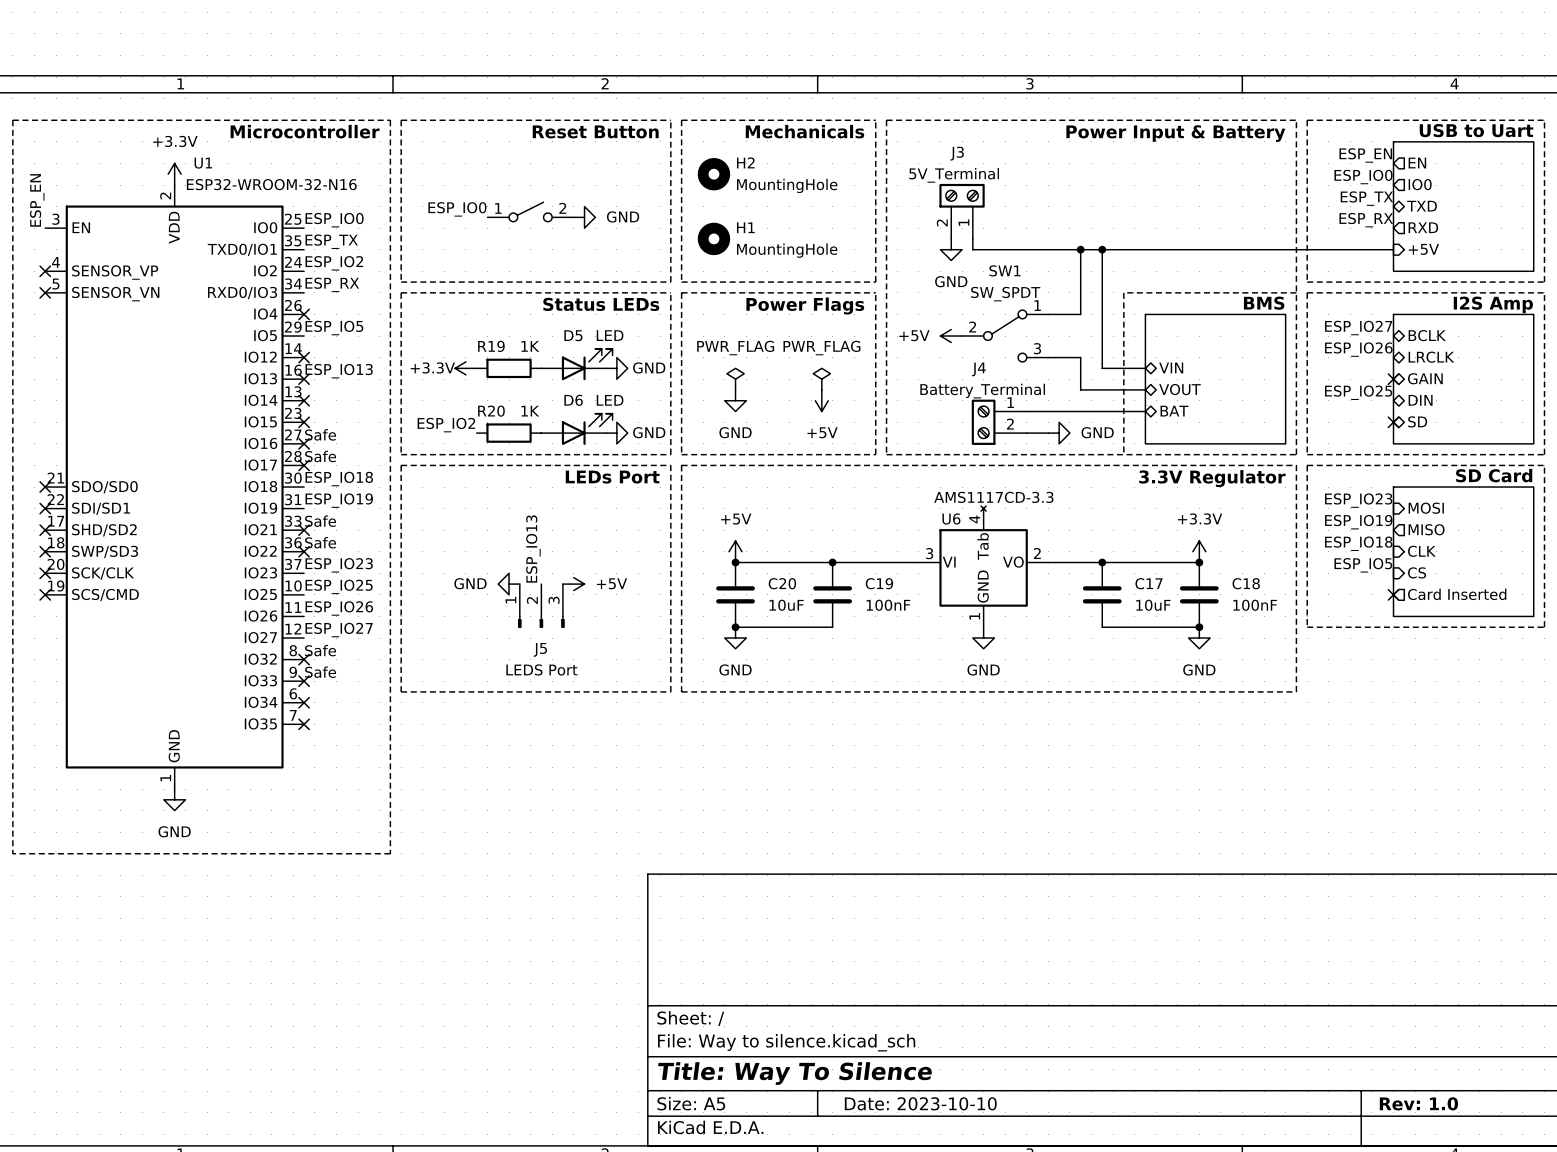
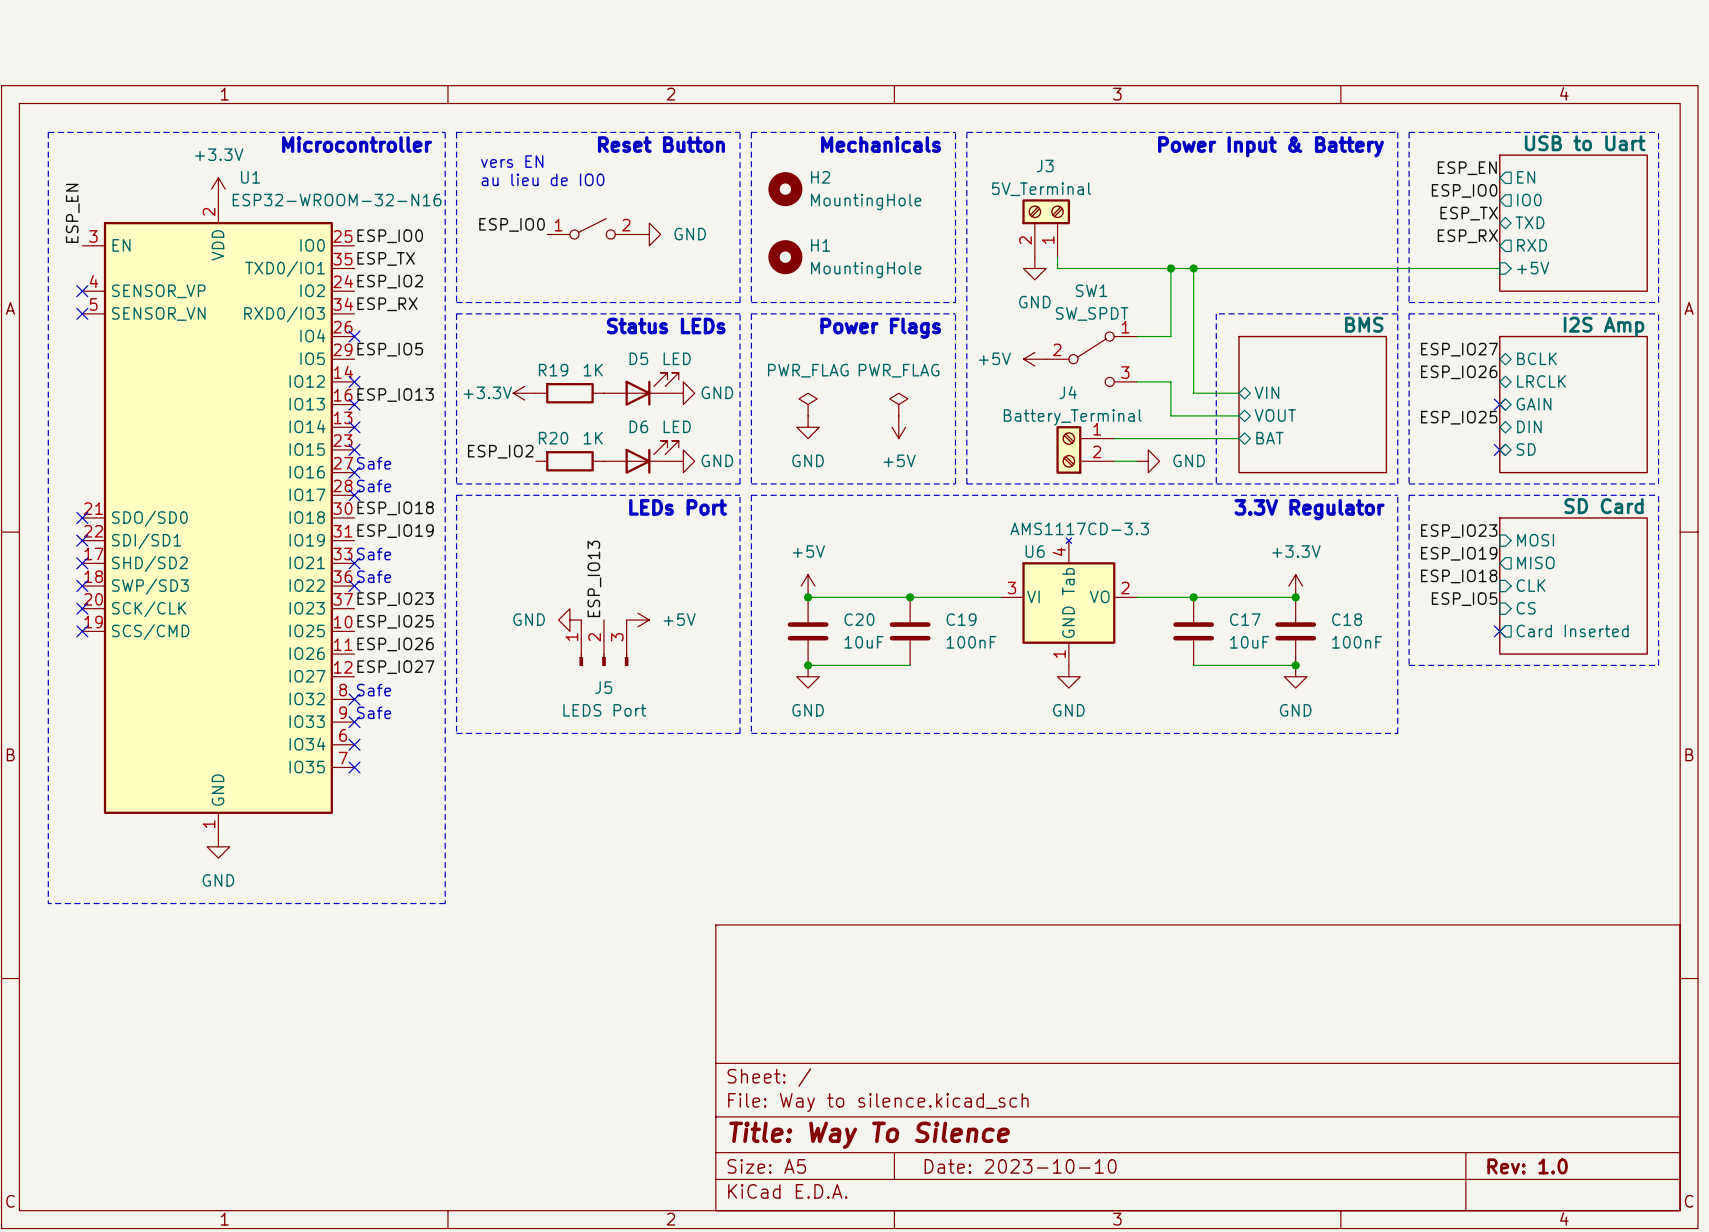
text: none -> vers EN (512, 161)
text: none -> au lieu de IO0 (543, 179)

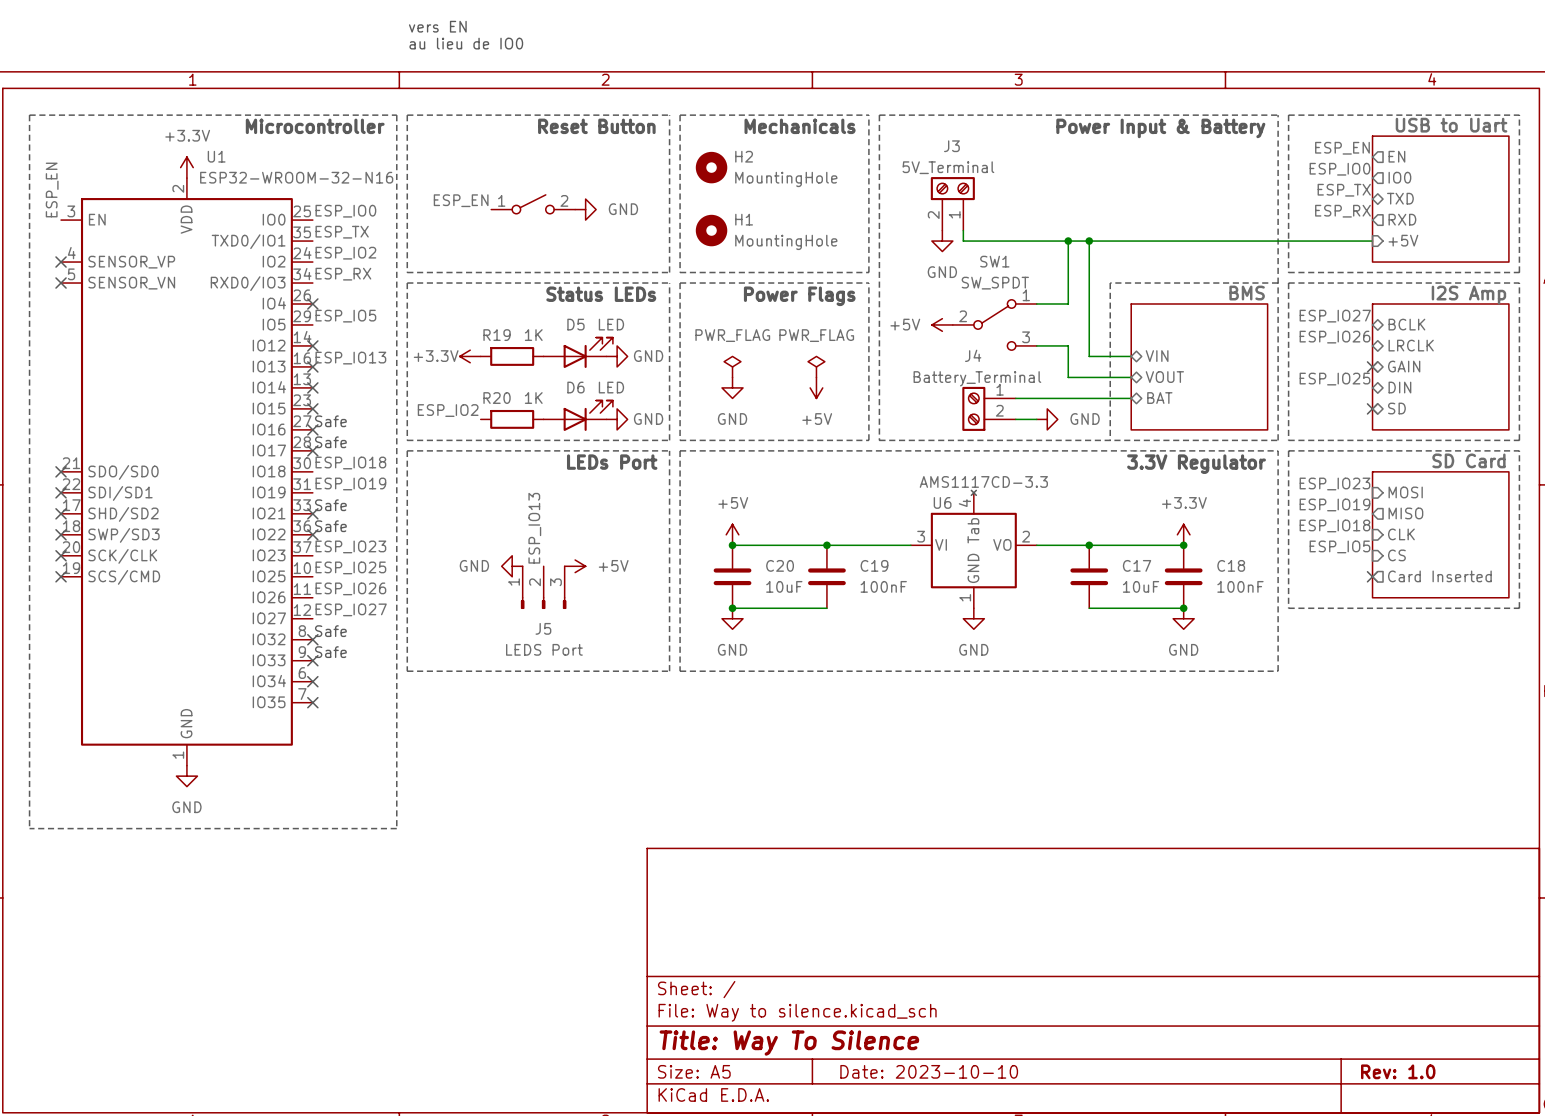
text position: vers EN (512, 161) -> vers EN (437, 26)
text position: au lieu de IO0 (543, 179) -> au lieu de IO0 (466, 43)
label: ESP_IO0 (512, 224) -> ESP_EN (461, 200)

